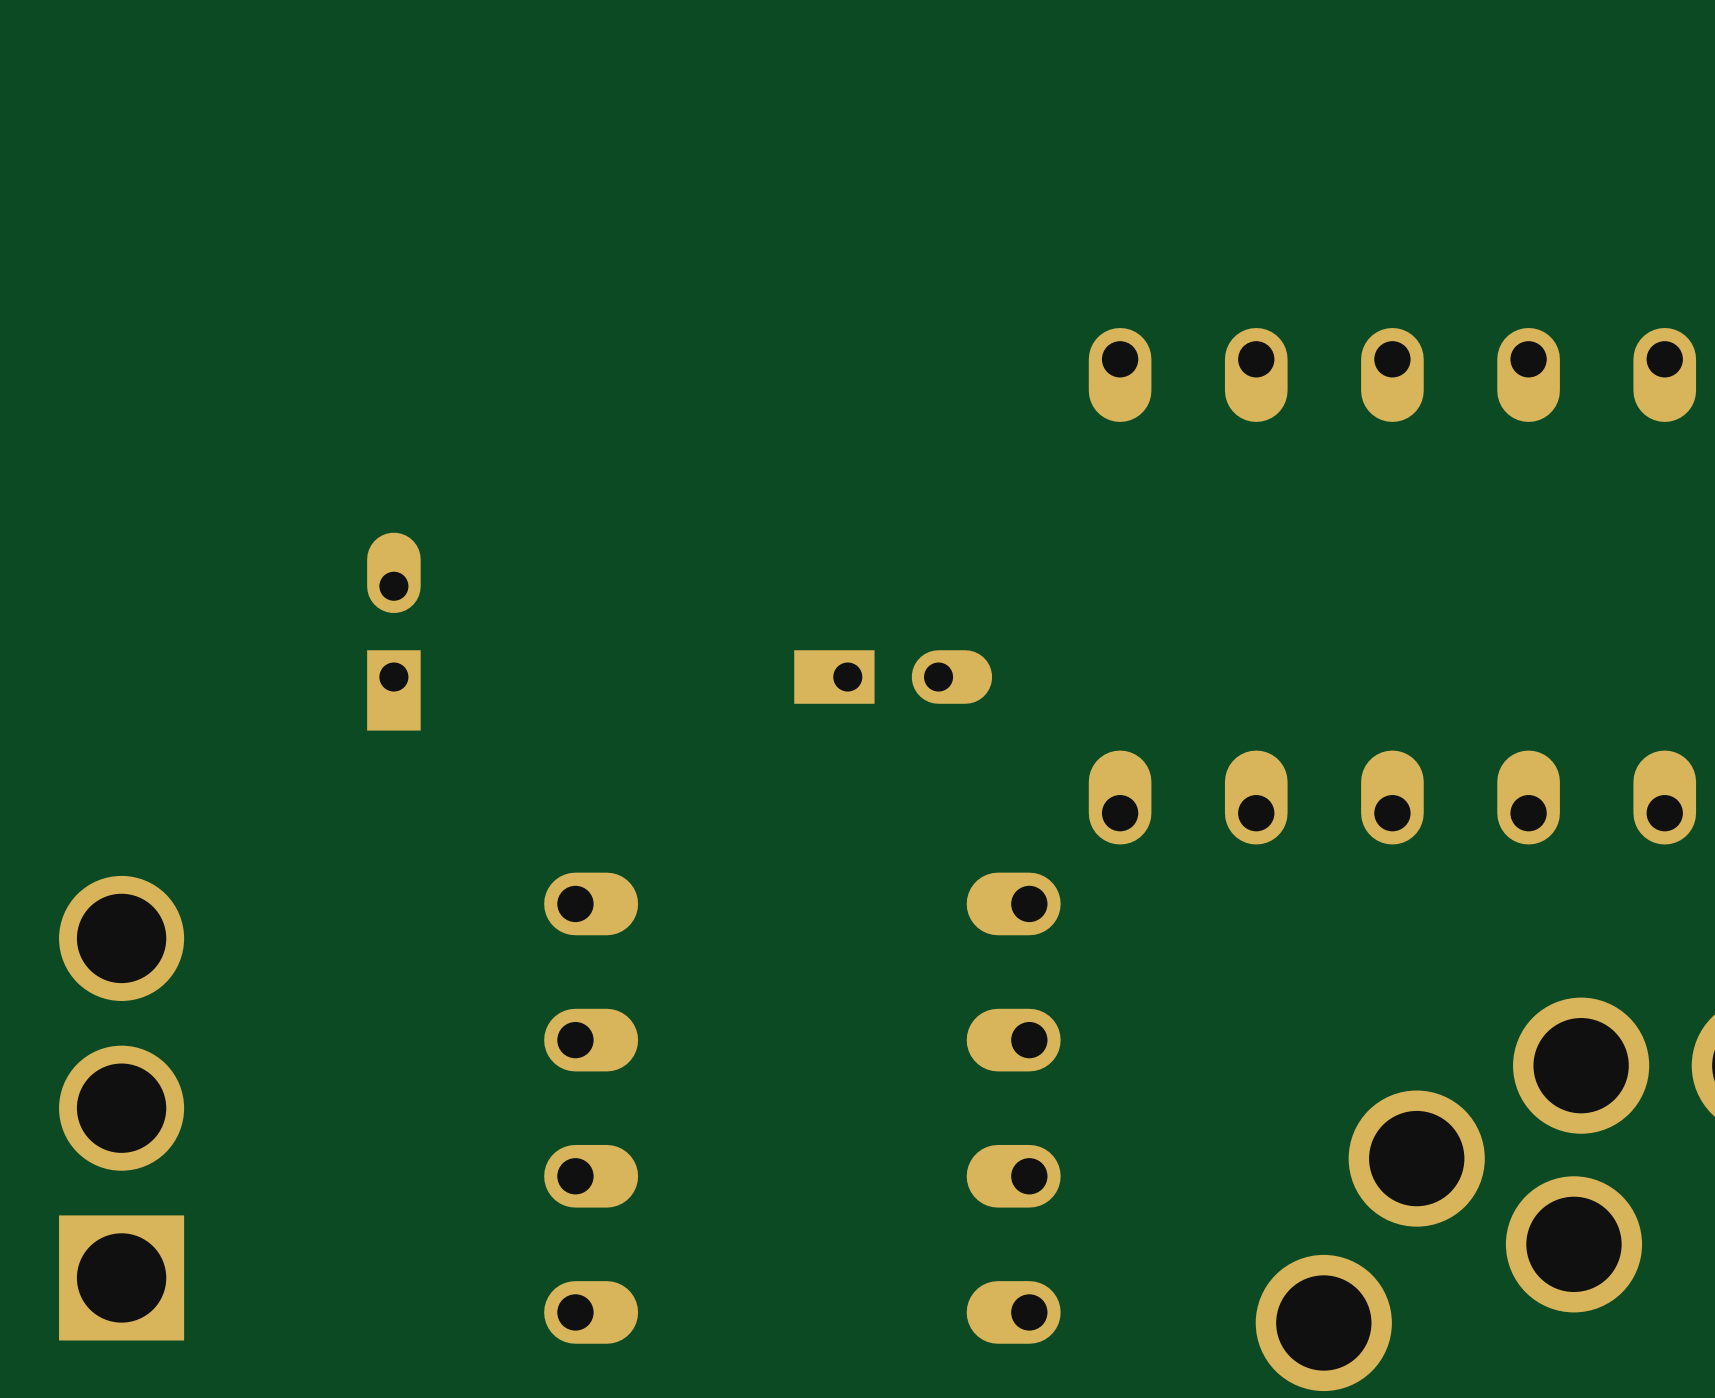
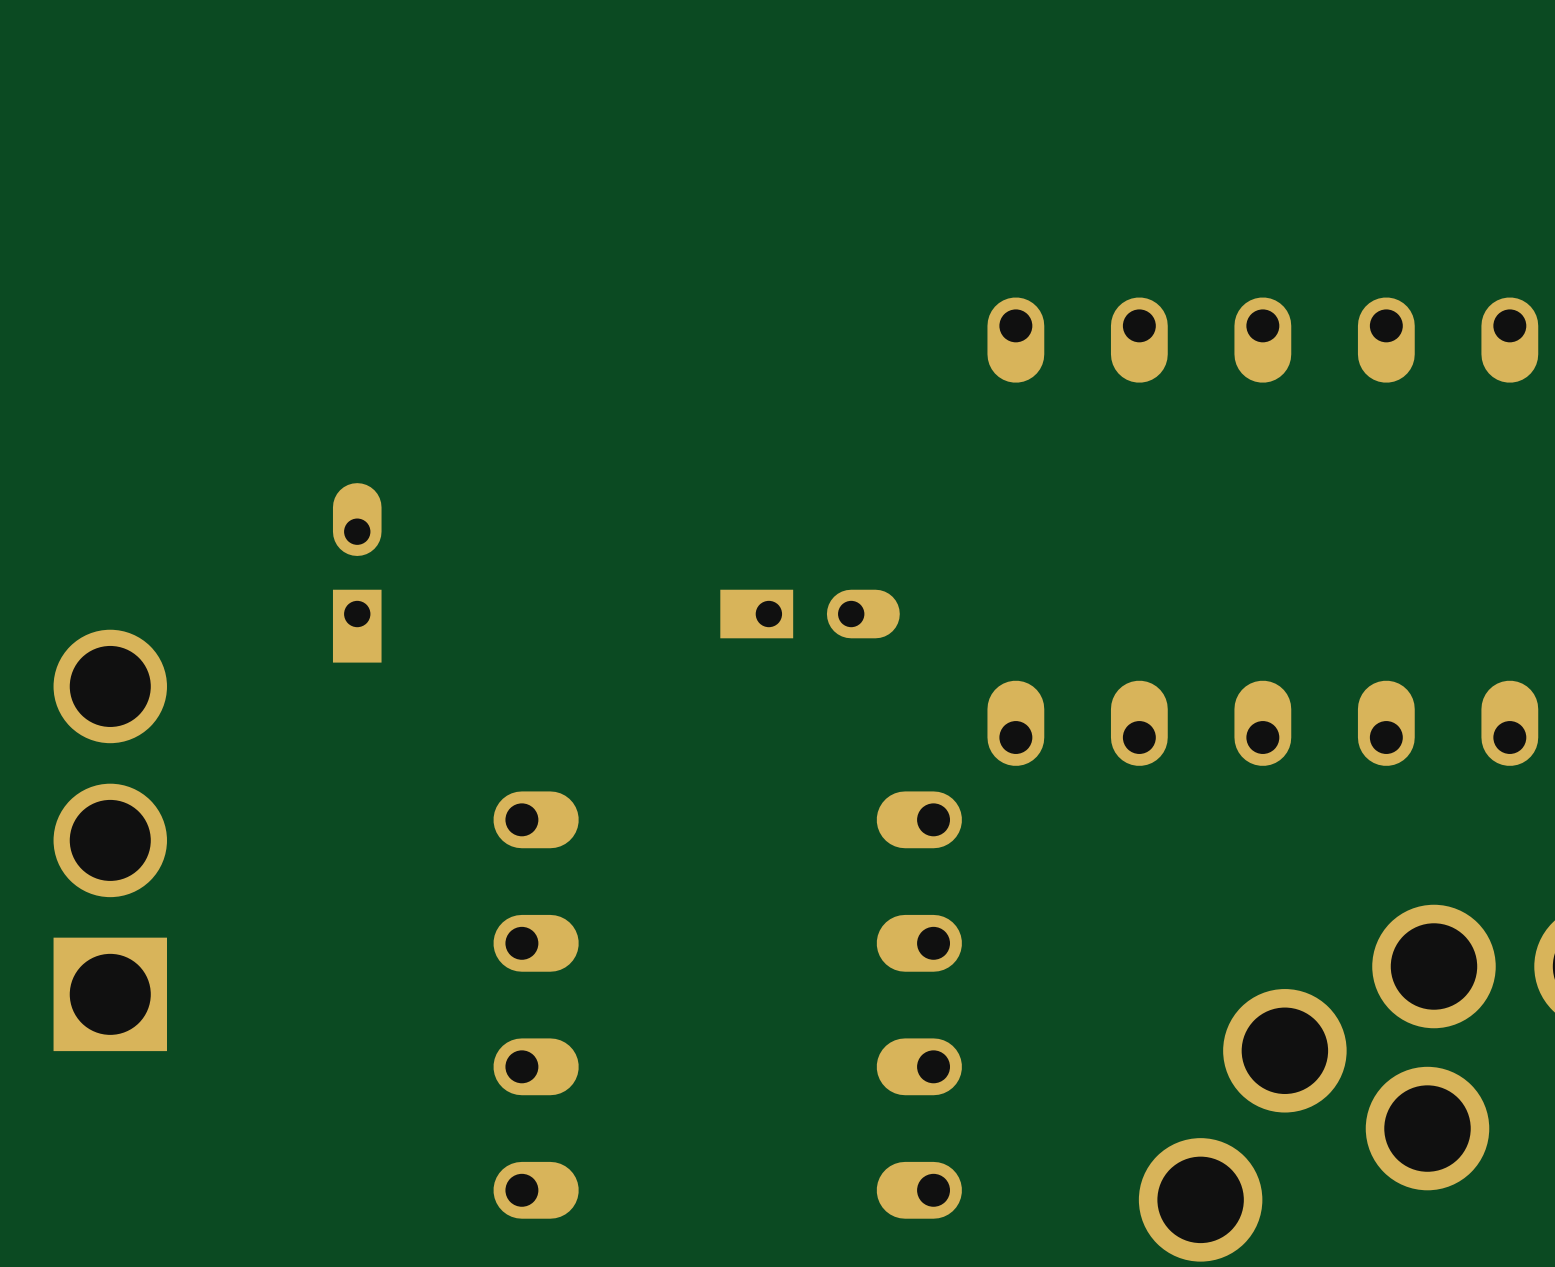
part position: (121, 1108) -> (110, 840)

